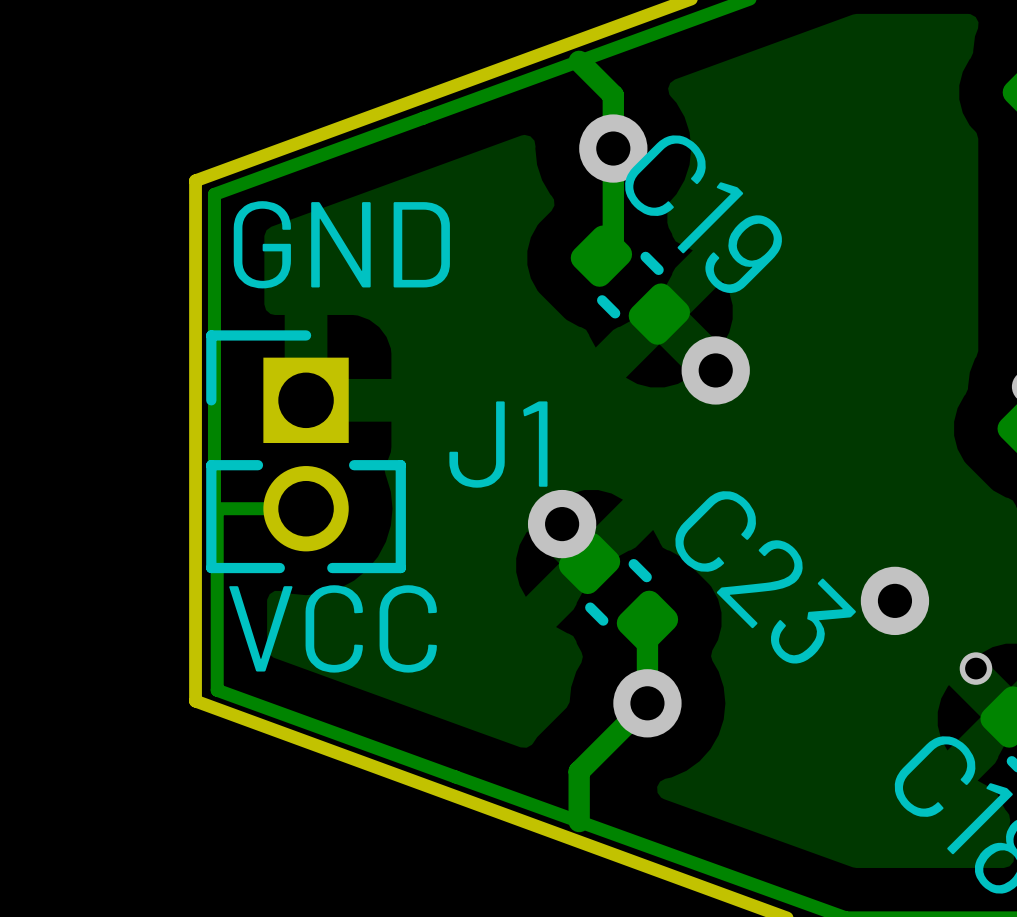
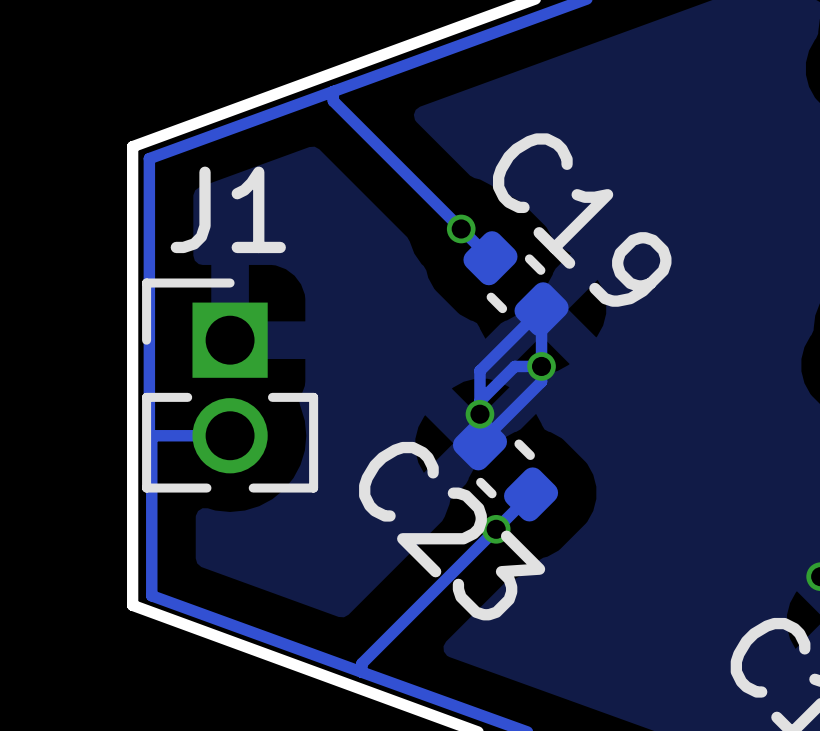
track: (579, 61) (613, 95) (613, 244) (601, 256) -> none
track: none -> (333, 91) (333, 101) (490, 258)
via: (613, 148) -> none
text: GND (341, 244) -> none
via: none -> (461, 228)
C19 position: (630, 285) -> (516, 283)
track: none -> (541, 309) (541, 381) (479, 443) (479, 370) (541, 309)
via: (715, 370) -> none
track: none -> (541, 366) (514, 366) (479, 401)
via: none -> (541, 366)
J1 name position: J1 (498, 444) -> J1 (228, 209)
via size: [527, 489, 597, 559] -> [465, 399, 495, 429]
track: none -> (531, 494) (361, 663) (361, 672)
C23 name position: C23 (765, 577) -> C23 (452, 531)
C23 position: (618, 592) -> (505, 468)
via: (894, 600) -> none
via: none -> (496, 529)
track: (647, 621) (647, 703) (579, 771) (579, 821) -> none
text: VCC (333, 628) -> none
via: (647, 703) -> none

